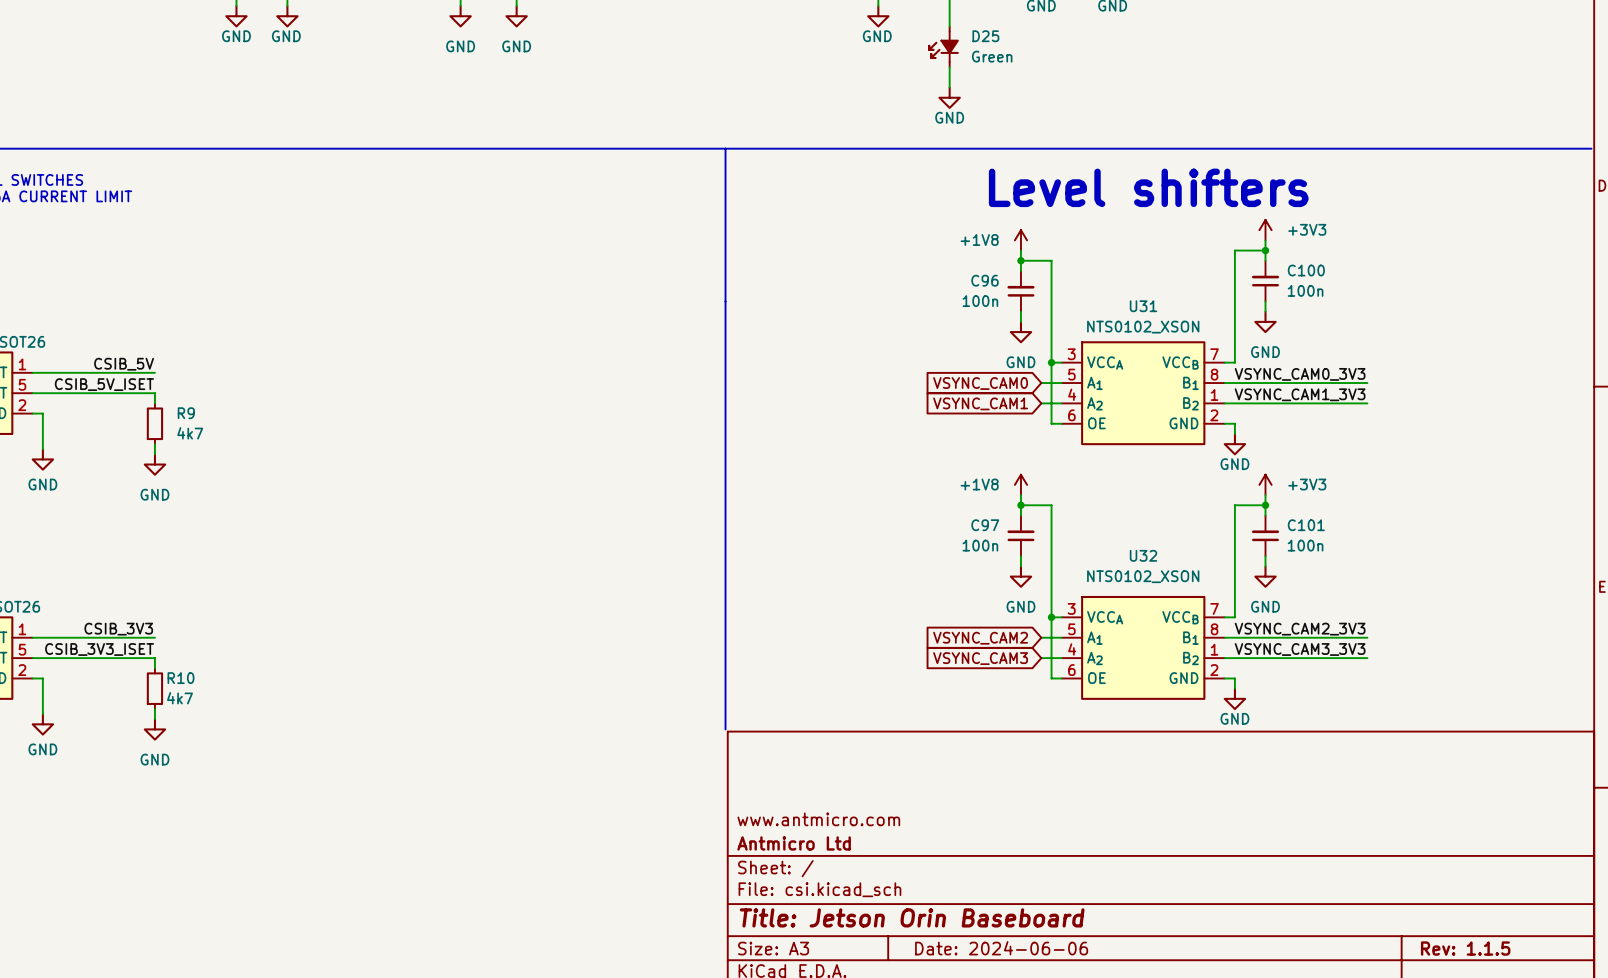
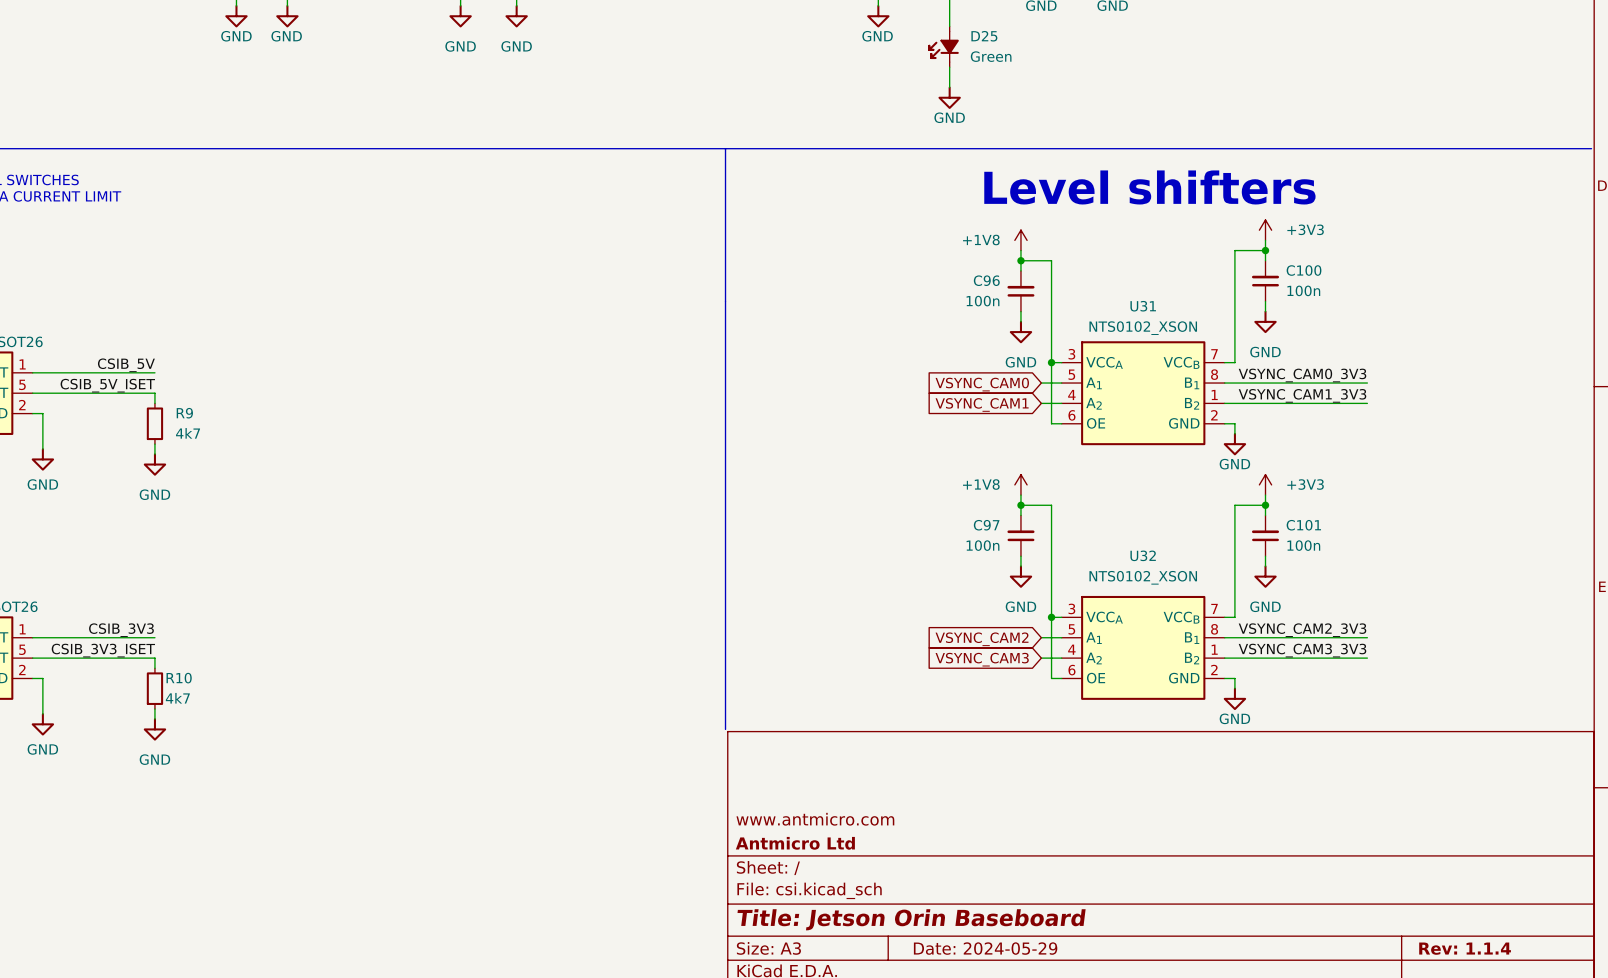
title block: Date: 2024-06-06 (1001, 948) -> Date: 2024-05-29 (985, 948)
title block: Rev: 1.1.5 (1465, 948) -> Rev: 1.1.4 (1465, 948)

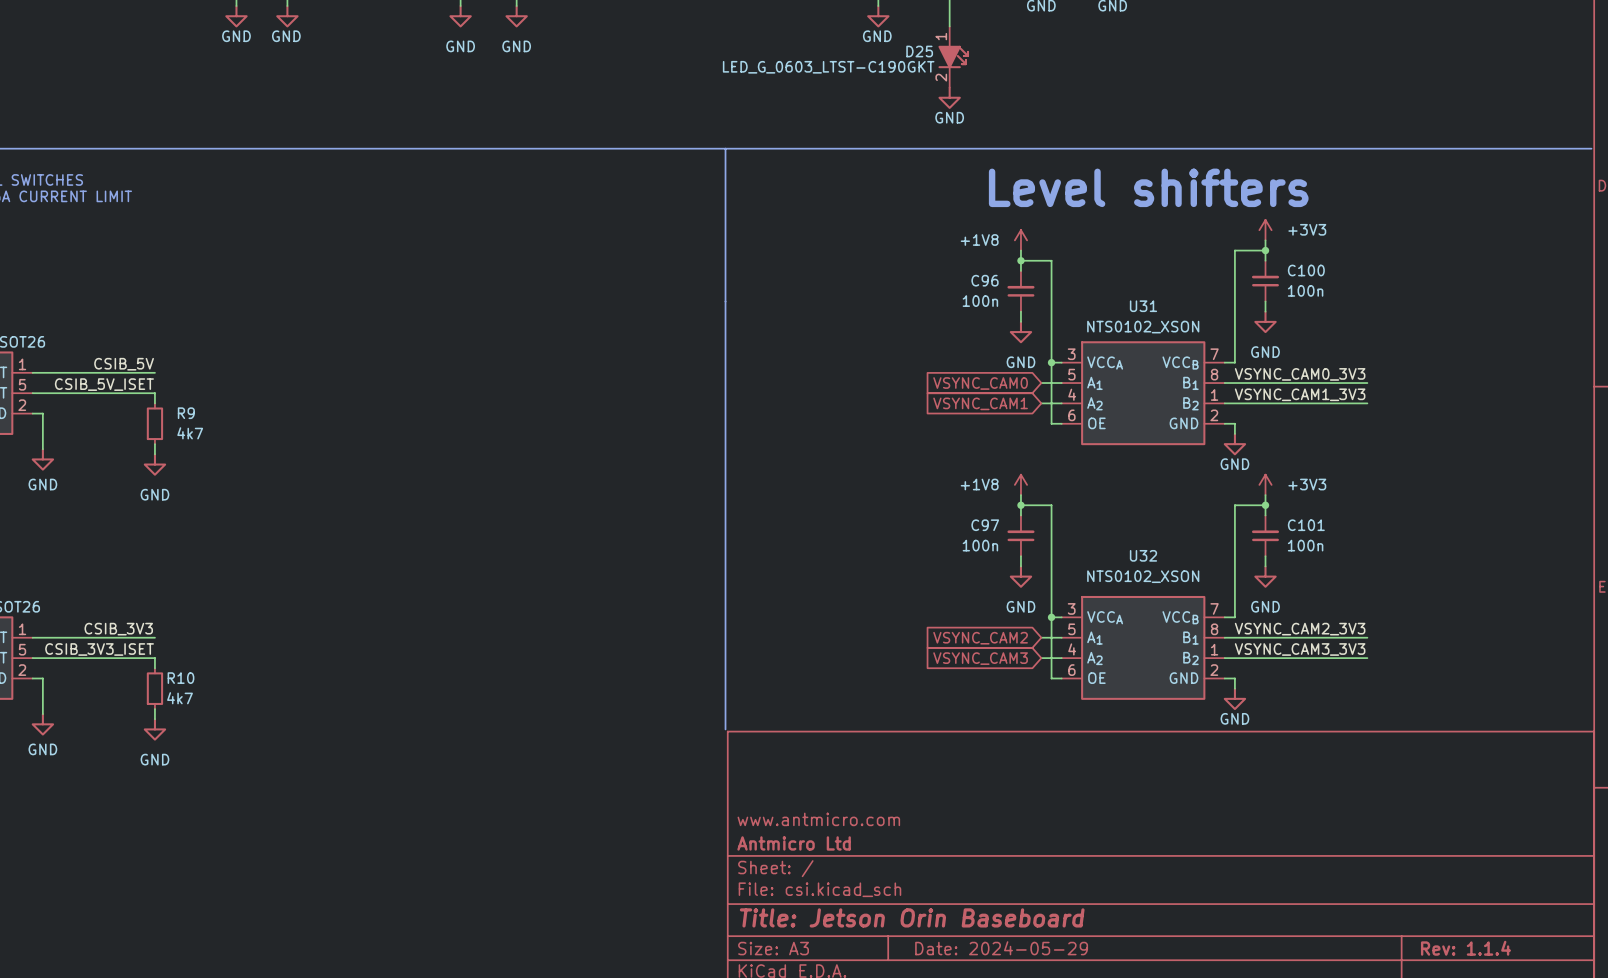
D25 symbol: [928, 26, 959, 68] -> [938, 26, 970, 88]
D25 name position: D25 (984, 36) -> D25 (919, 51)
D25 text: Green (991, 56) -> none
D25 value: none -> LED_G_0603_LTST-C190GKT (828, 67)

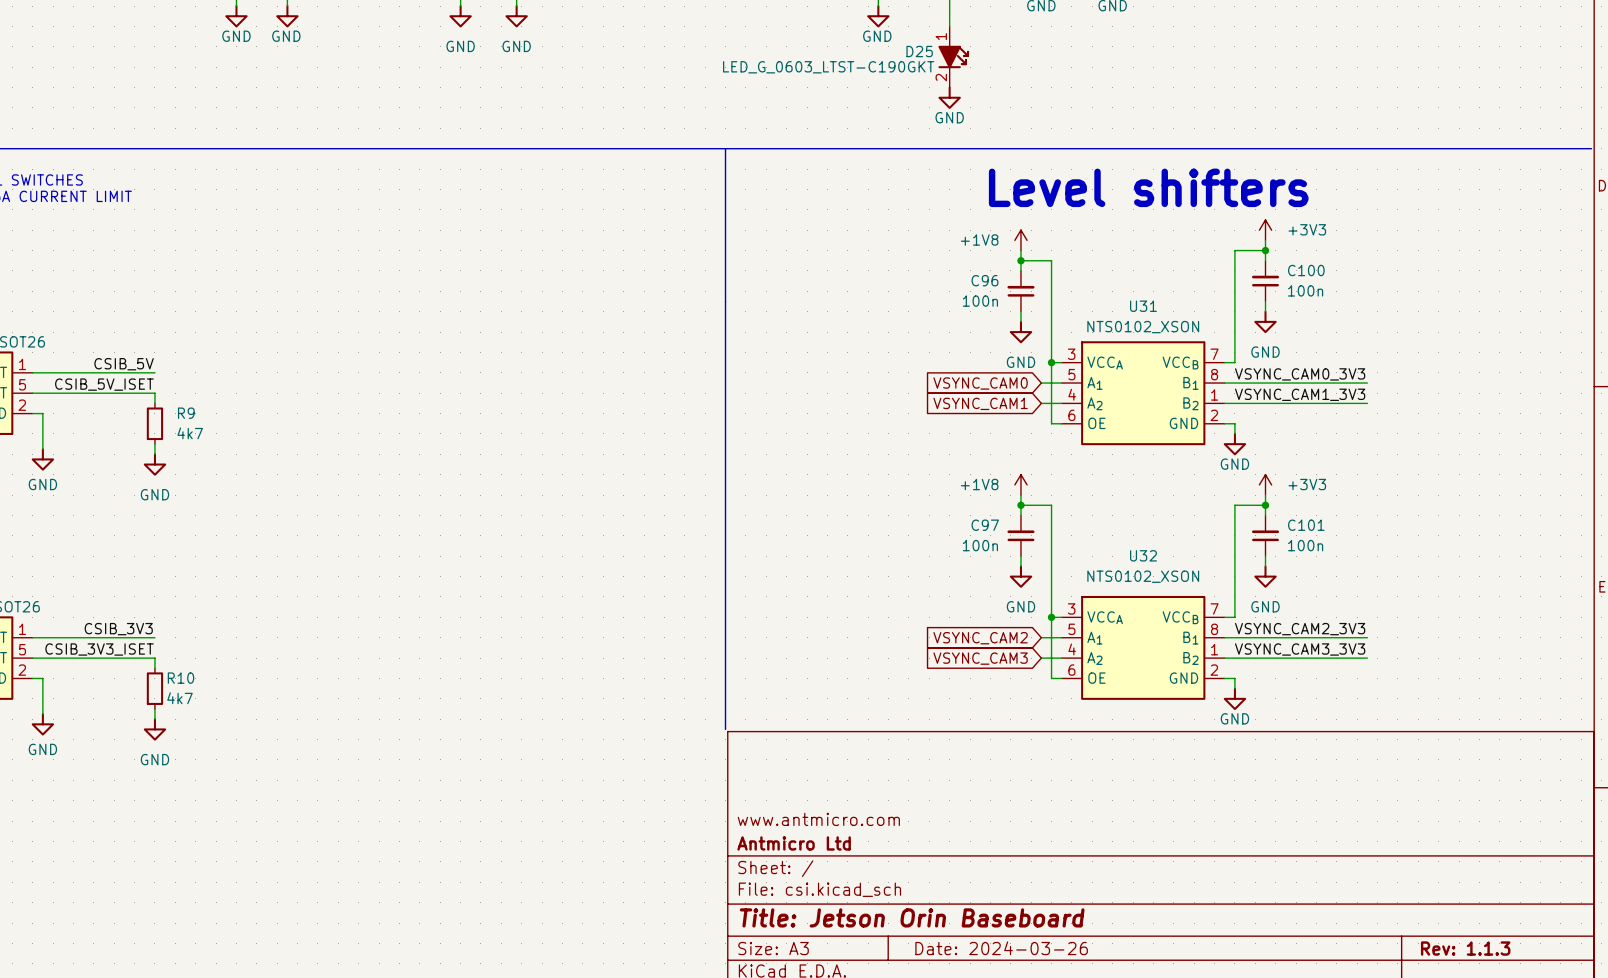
title block: Date: 2024-05-29 (1001, 948) -> Date: 2024-03-26 (1001, 948)
title block: Rev: 1.1.4 (1465, 948) -> Rev: 1.1.3 (1465, 948)

